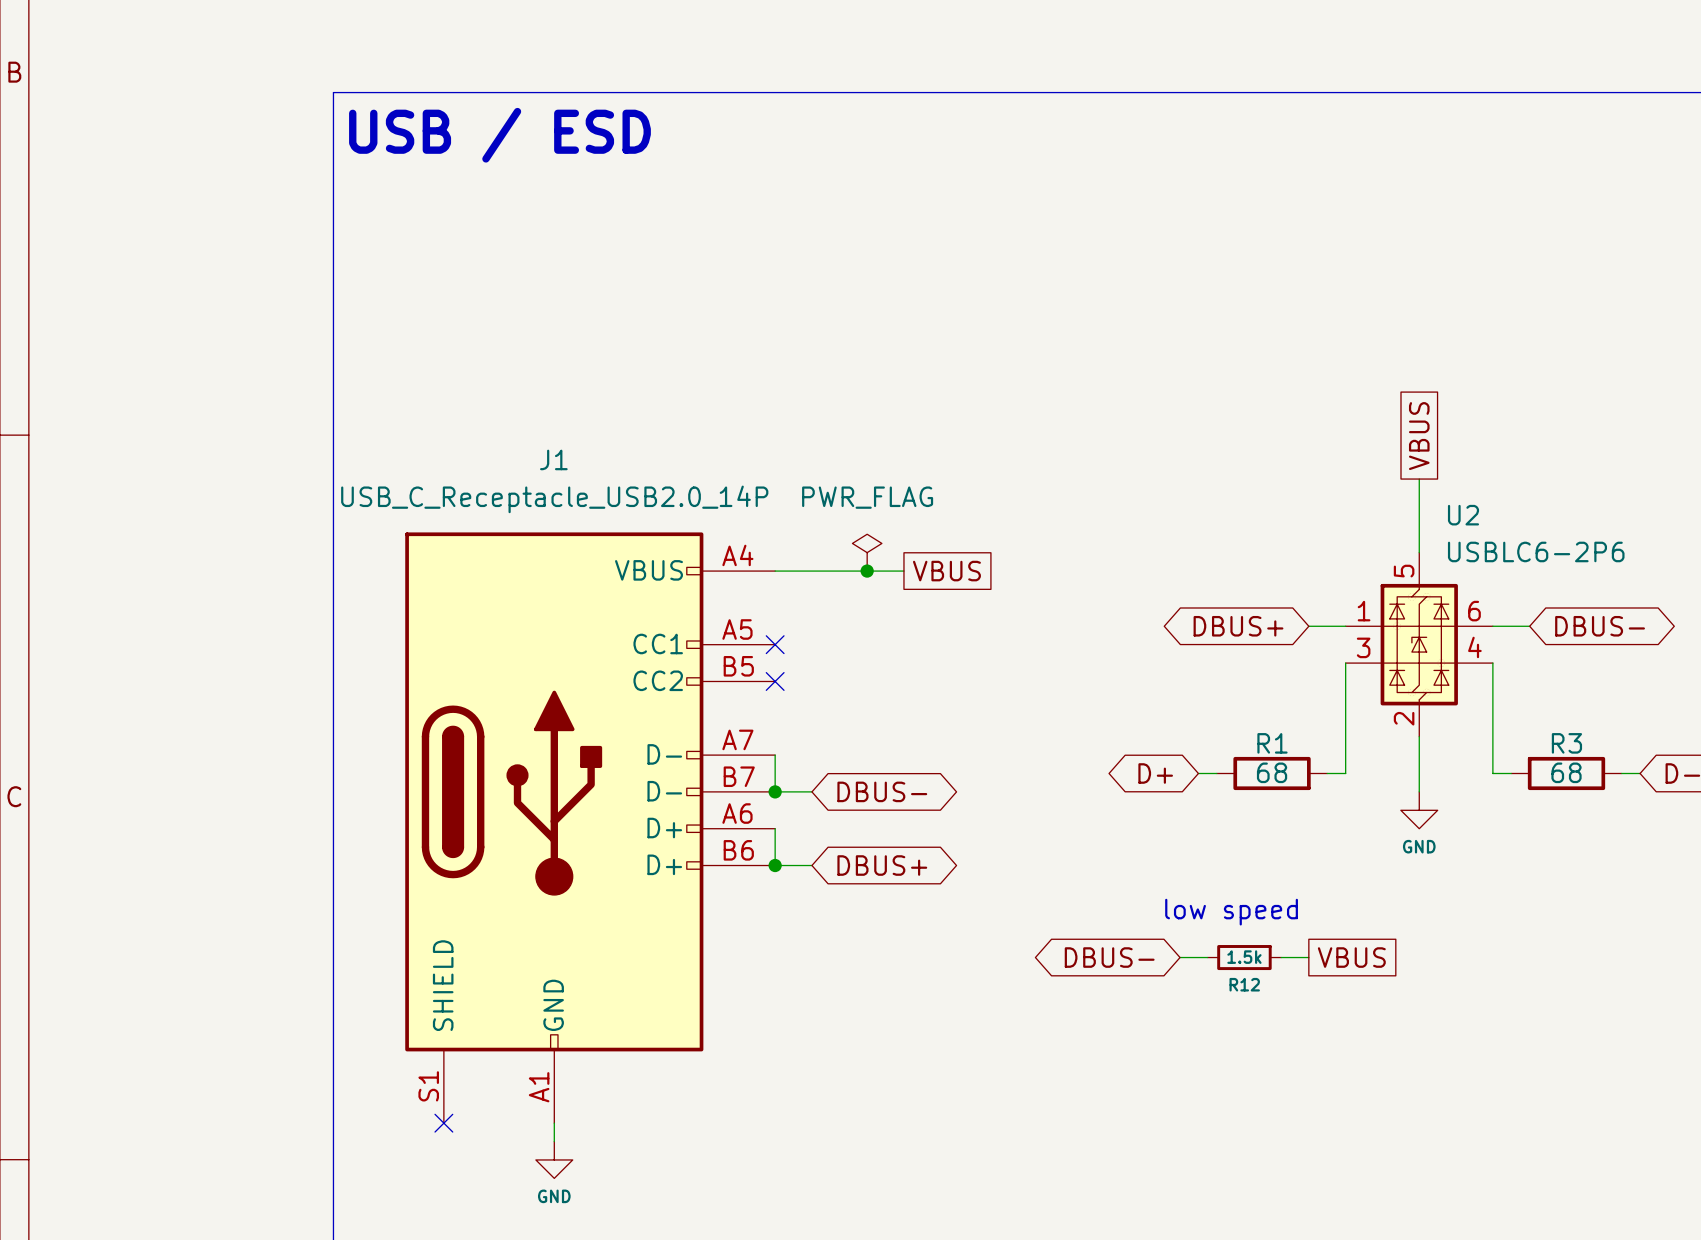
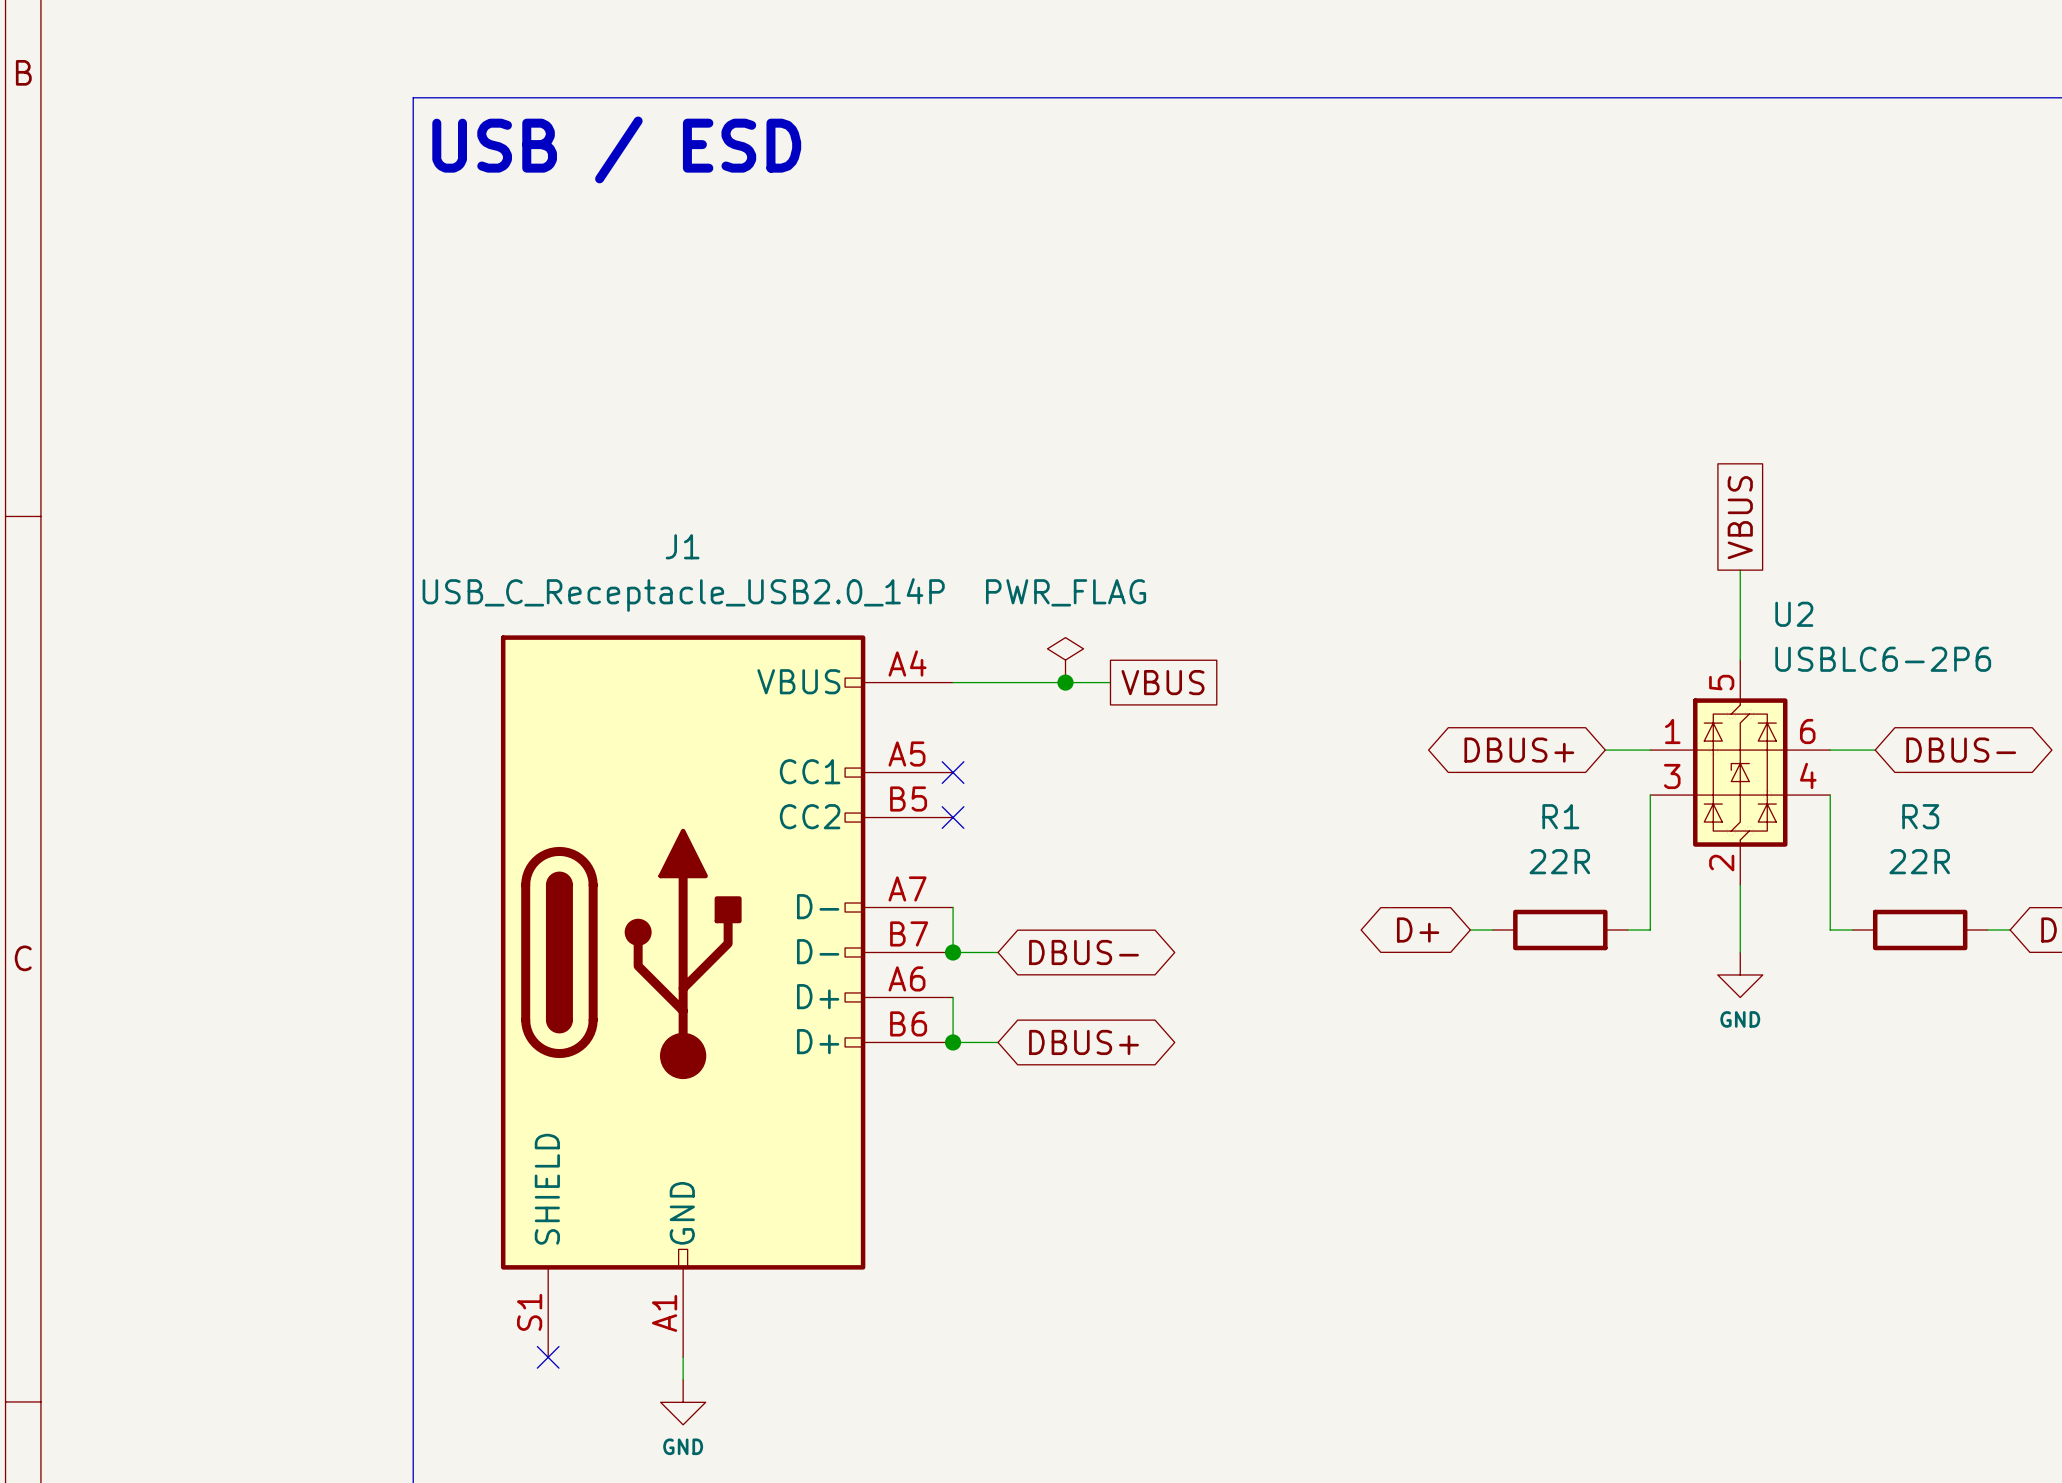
R1 name position: R1 (1272, 743) -> R1 (1560, 816)
R3 name position: R3 (1566, 743) -> R3 (1920, 816)
R1 value: 68 (1272, 772) -> 22R (1559, 861)
R3 value: 68 (1566, 772) -> 22R (1919, 861)
text: low speed (1231, 912) -> none
global label: DBUS- (1109, 957) -> none
wire: (1180, 957) (1207, 957) -> none
R12: 1.5k (1244, 957) -> none
wire: (1281, 957) (1308, 957) -> none
global label: VBUS (1351, 957) -> none

